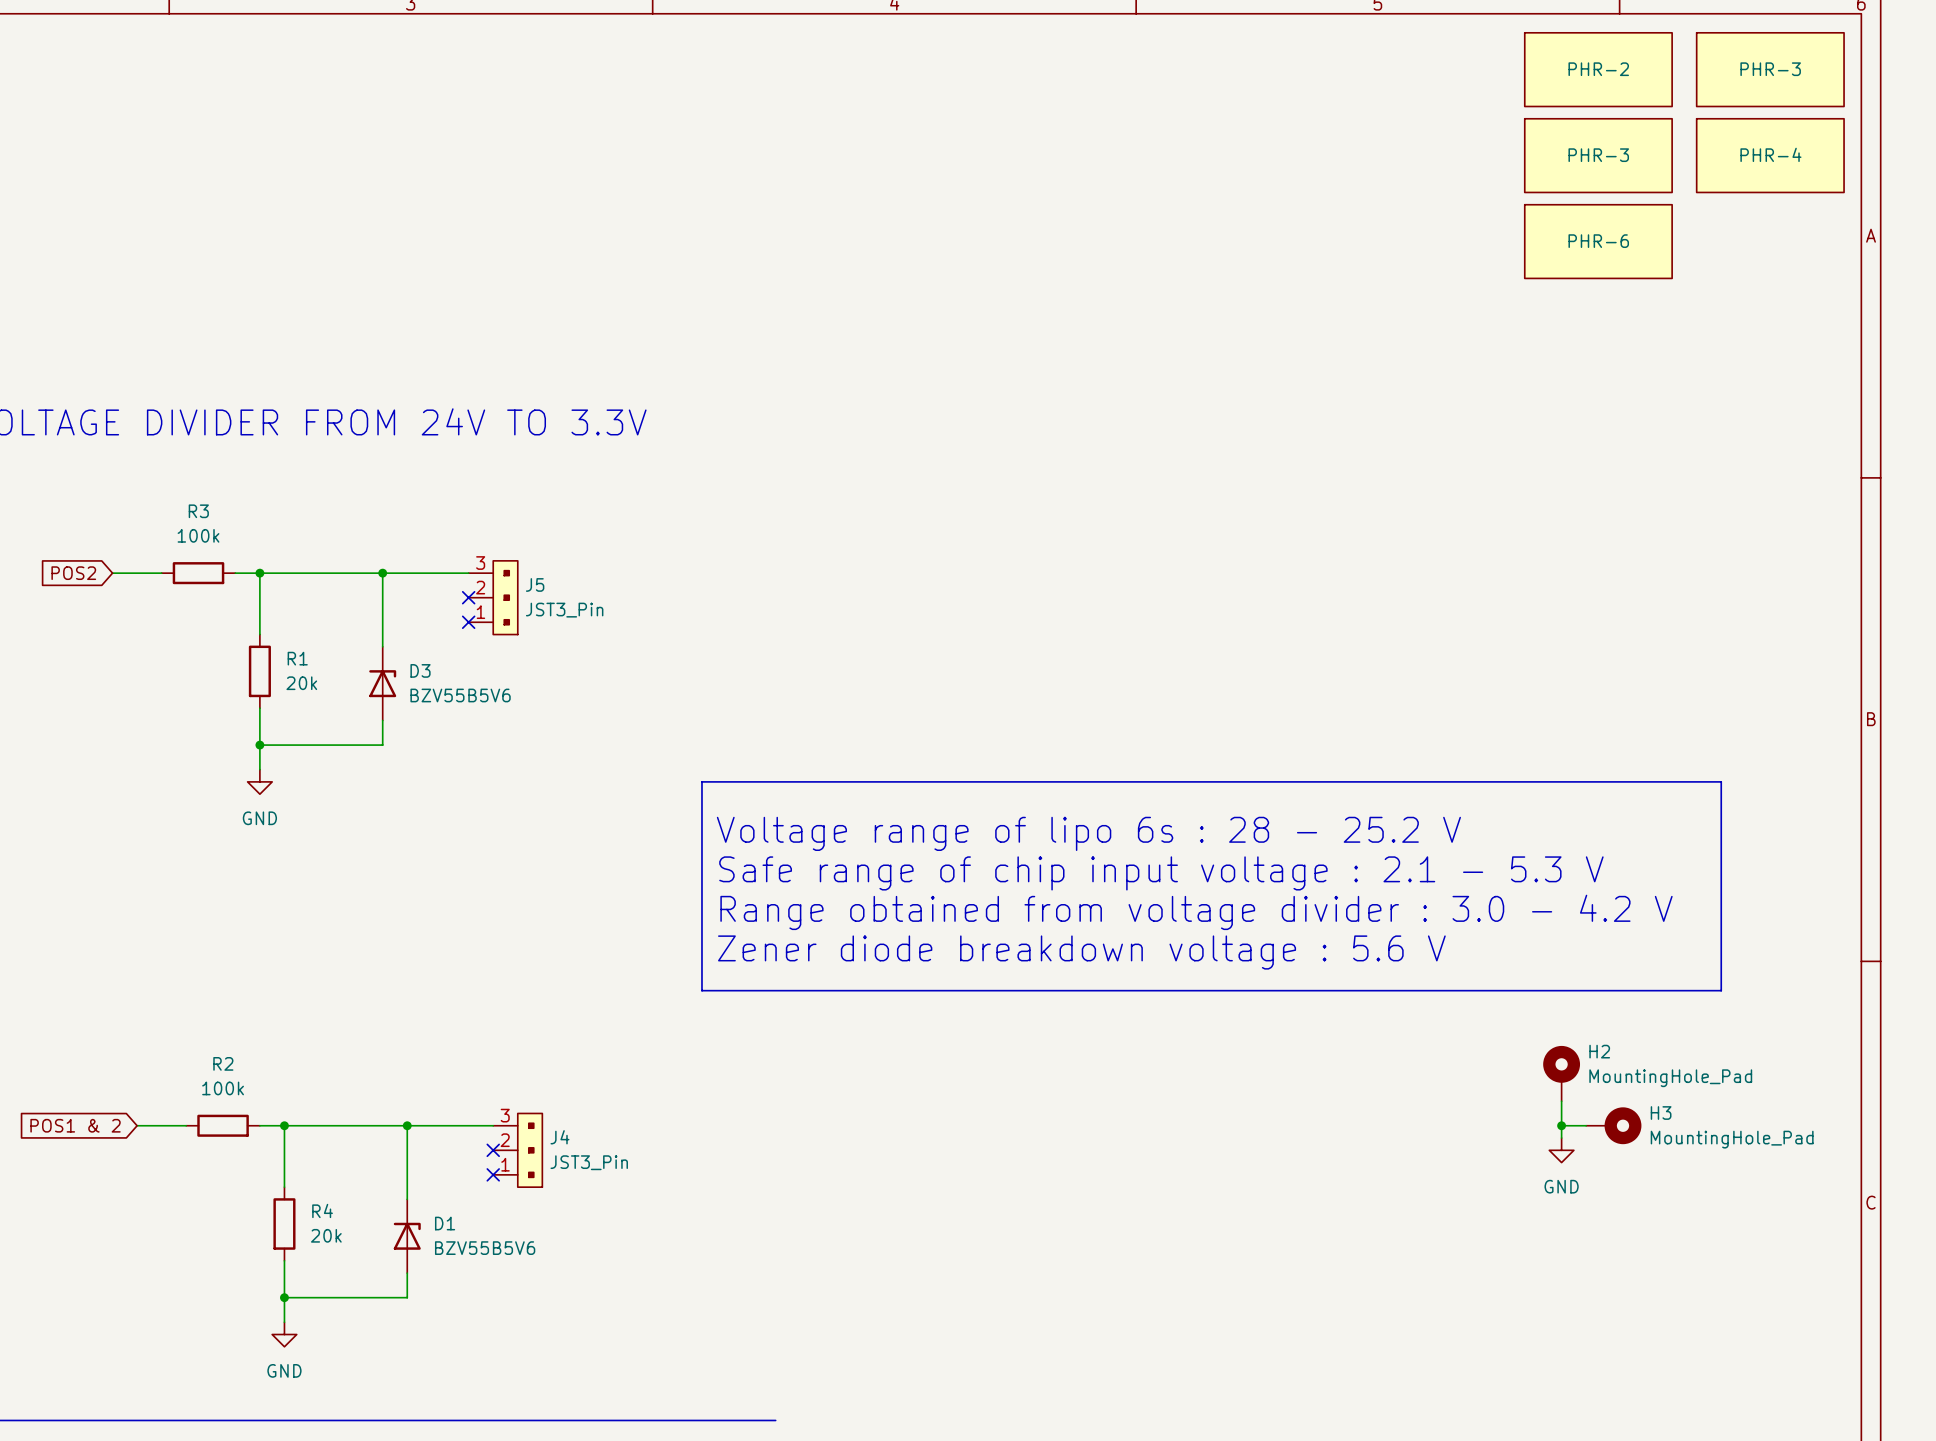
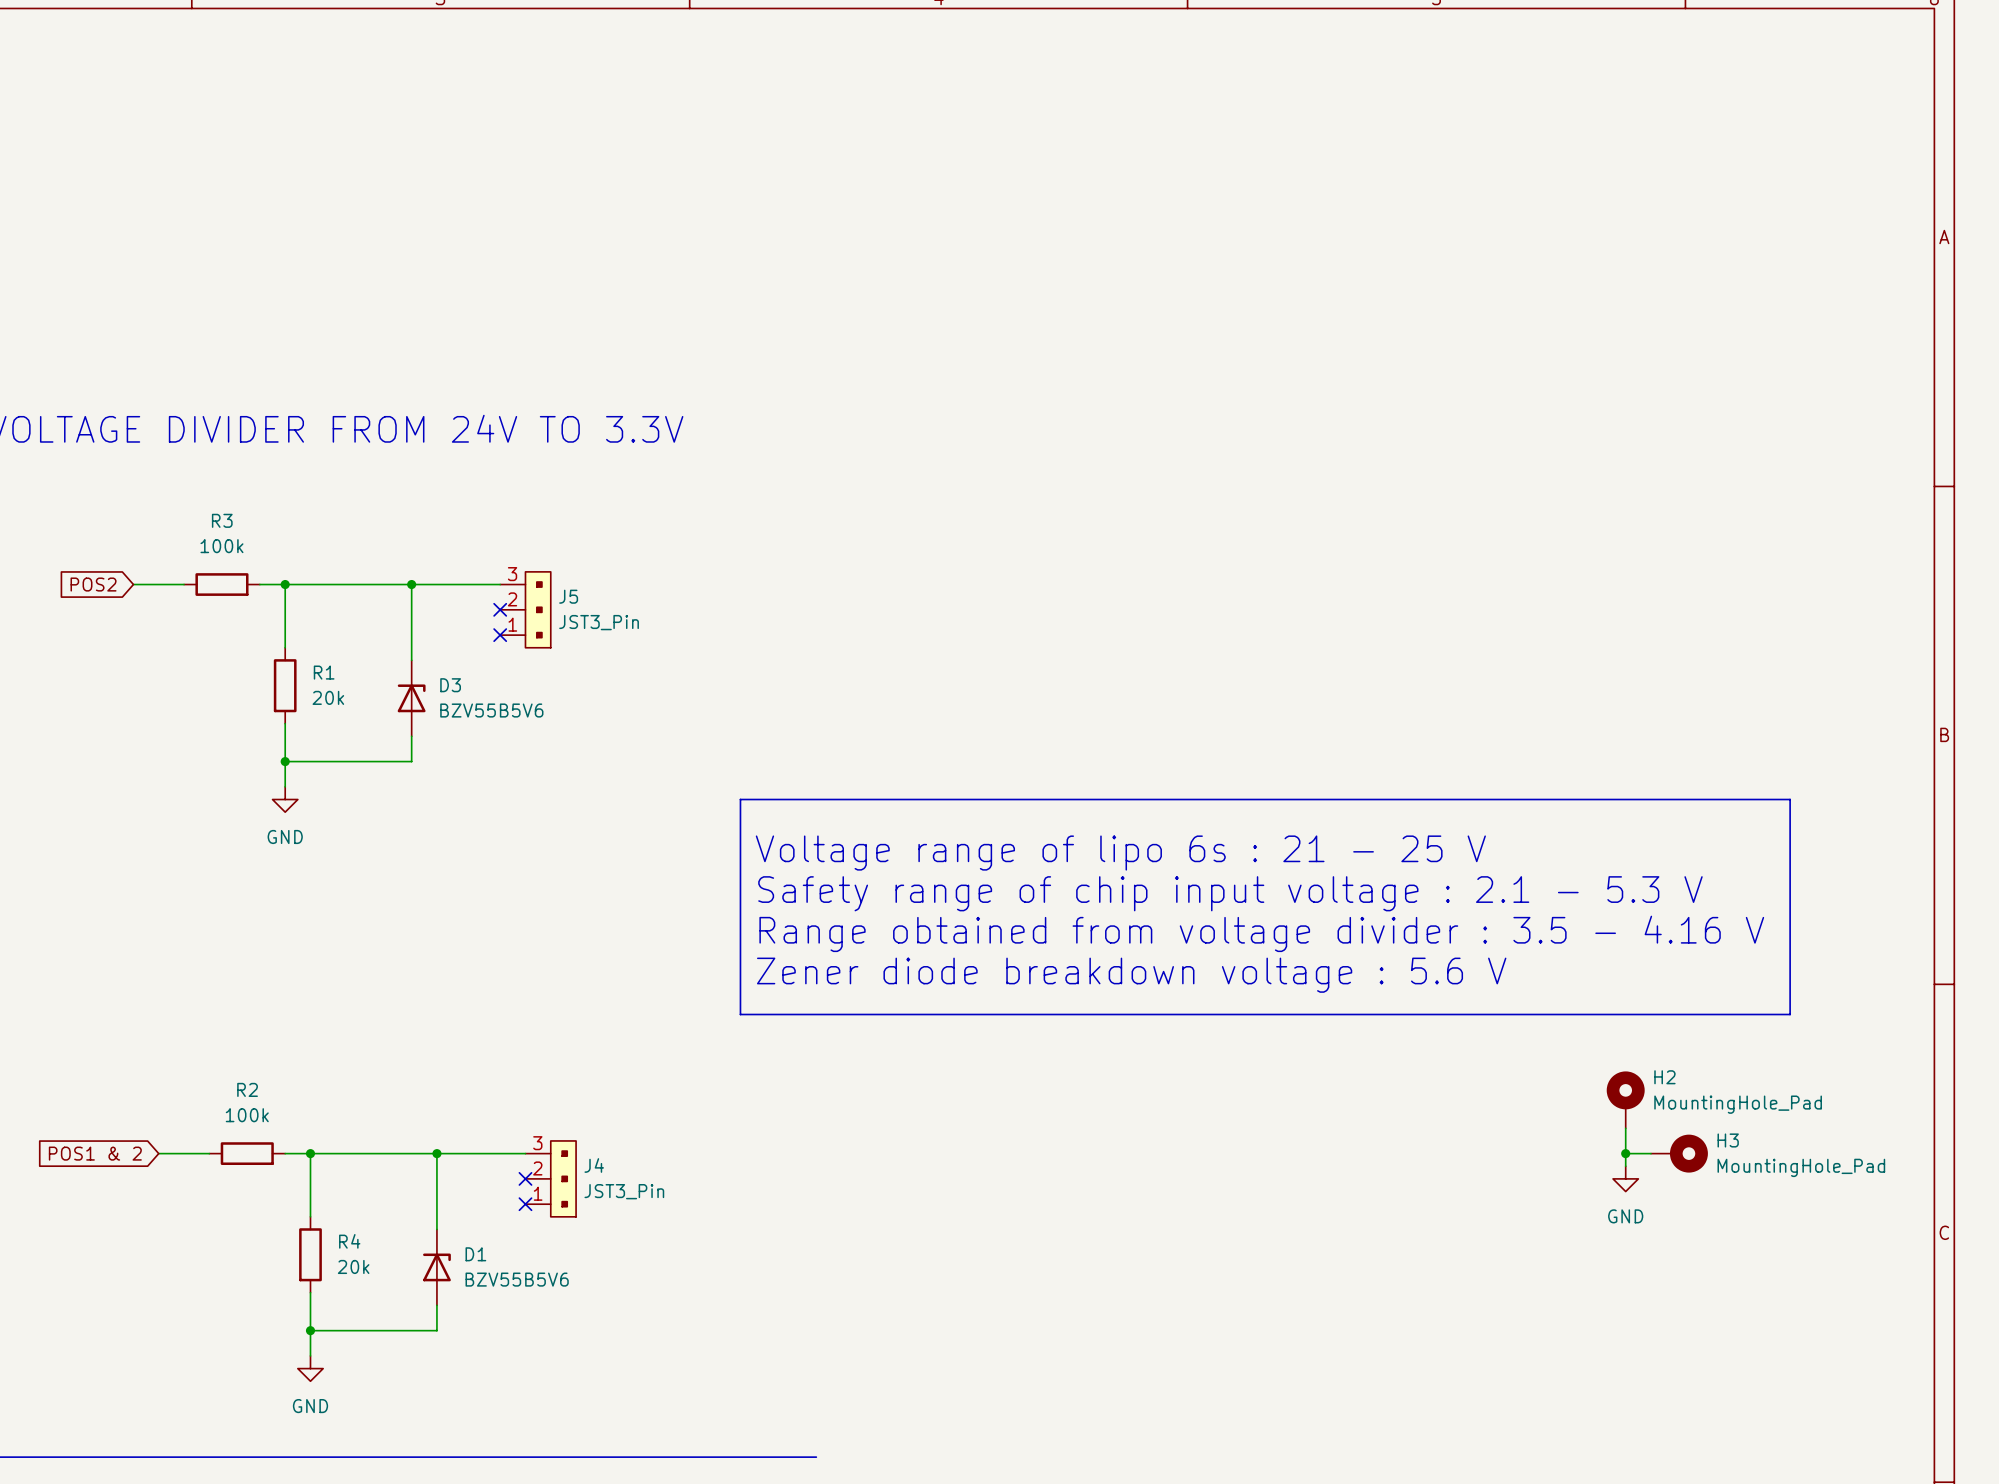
part: PHR-2 (1598, 69) -> none
part: PHR-3 (1770, 69) -> none
part: PHR-3 (1598, 155) -> none
part: PHR-4 (1770, 155) -> none
part: PHR-6 (1598, 241) -> none
text: Voltage range of lipo 6s : 28 - 25.2 V (1088, 833) -> Voltage range of lipo 6s : 21 - 25 V (1120, 853)
text: Safe range of chip input voltage : 2.1 - 5.3 V (1161, 873) -> Safety range of chip input voltage : 2.1 - 5.3 V (1230, 893)
text: Range obtained from voltage divider : 3.0 - 4.2 V (1196, 912) -> Range obtained from voltage divider : 3.5 - 4.16 V (1261, 933)

